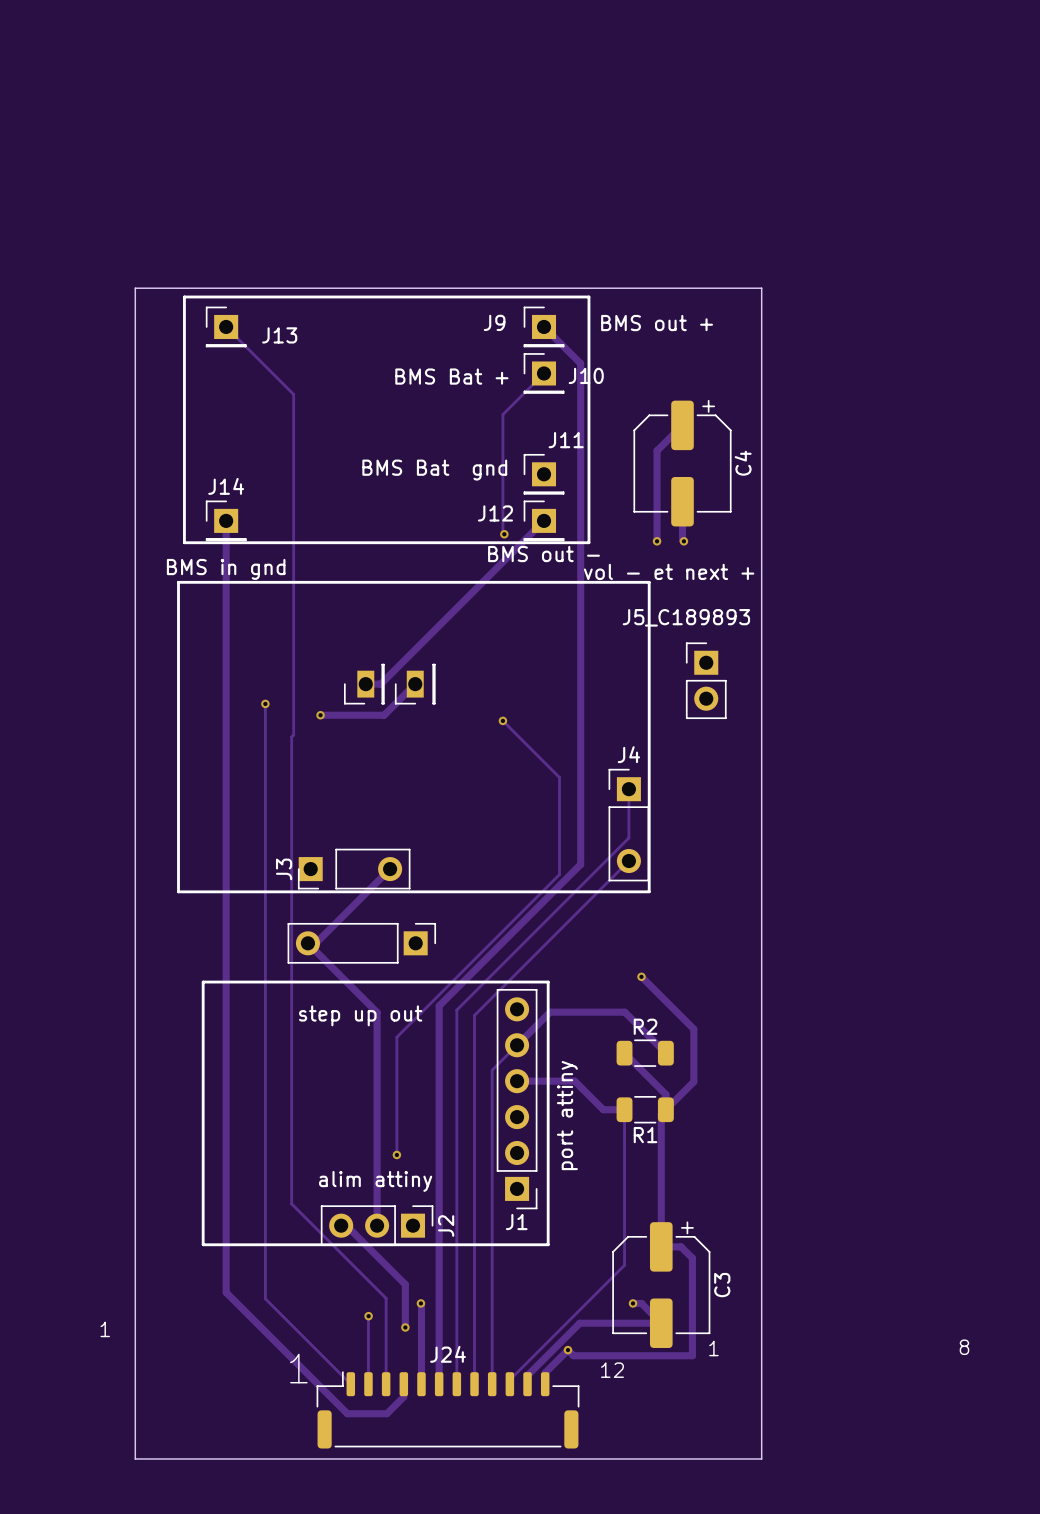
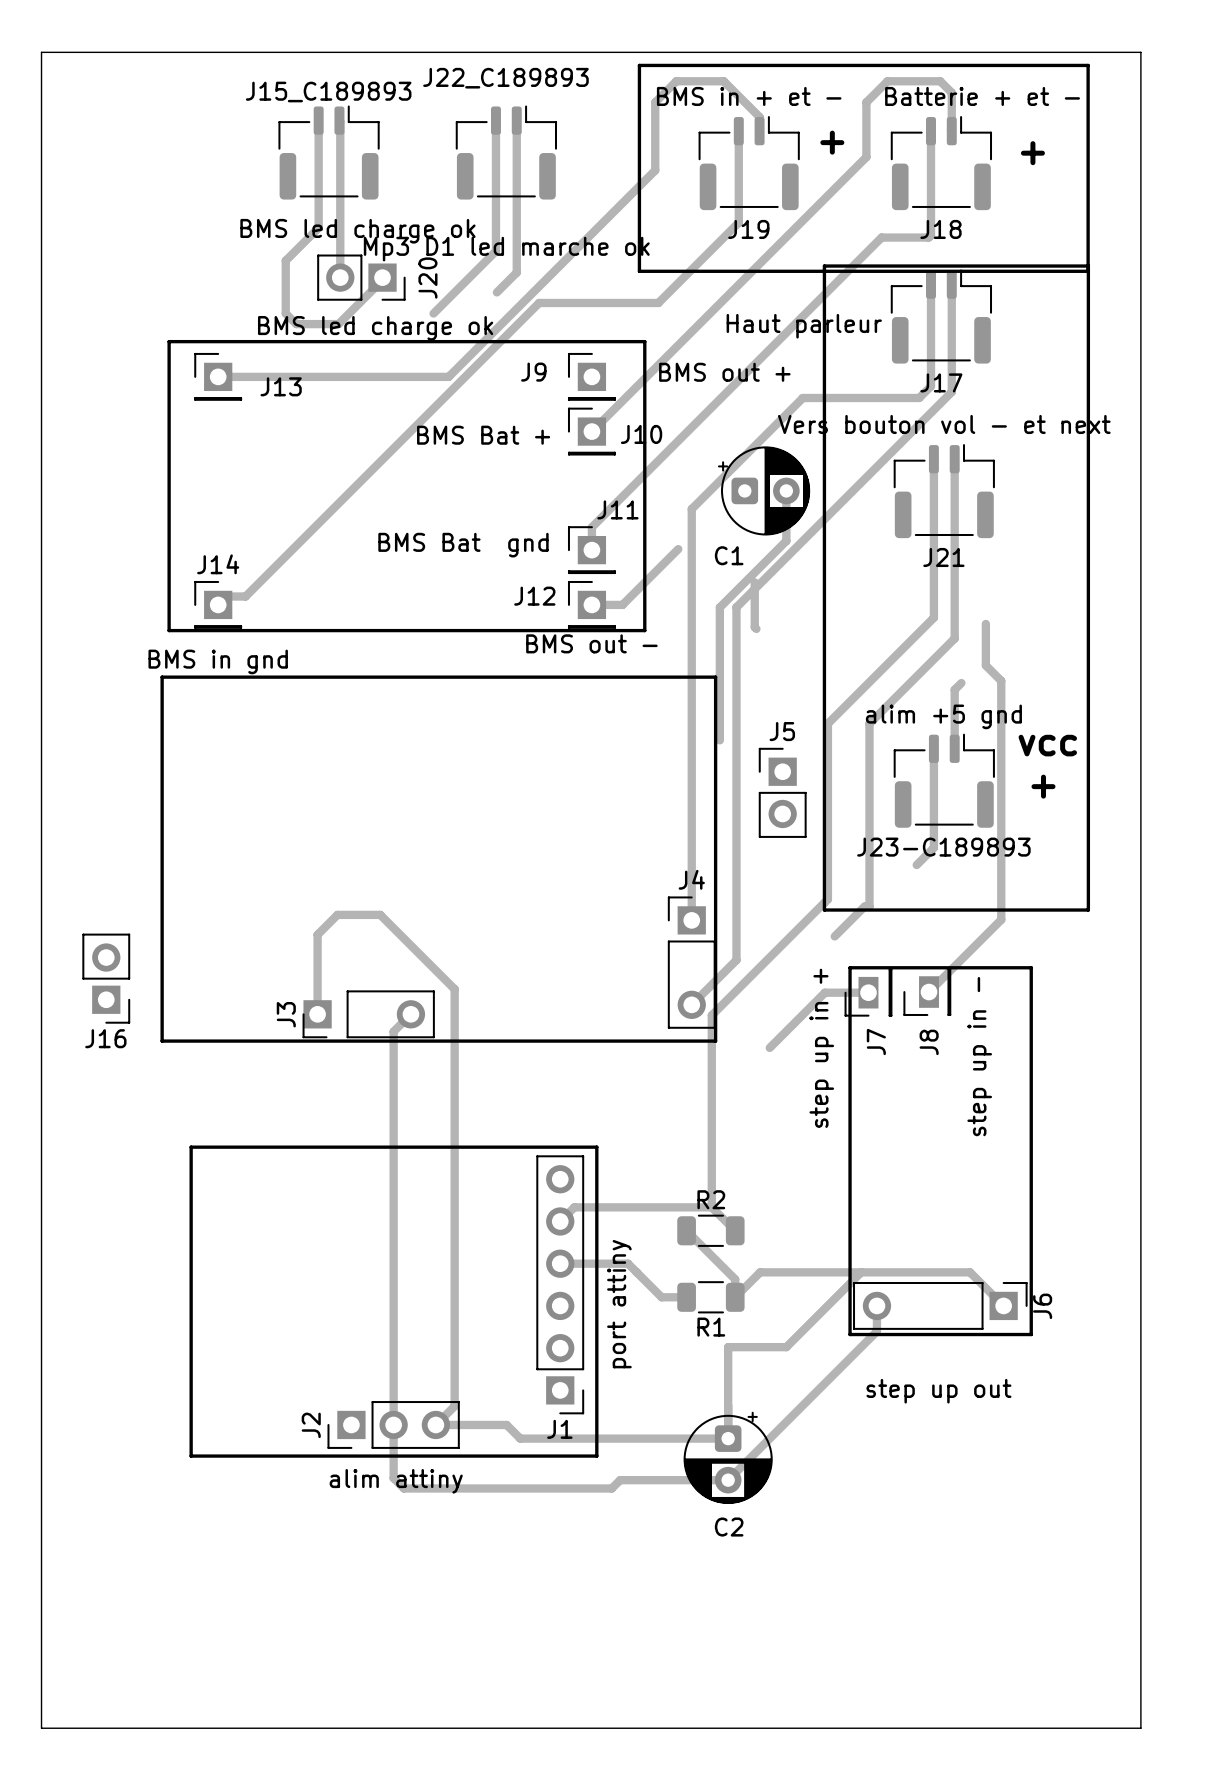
line: none -> (639, 65) (1088, 65) (1088, 271) (639, 271) (639, 65)
track: none -> (318, 120) (318, 227) (285, 260) (285, 313) (296, 324) (338, 324) (382, 280) (382, 277)
track: none -> (339, 120) (340, 277)
track: none -> (495, 120) (495, 251) (433, 313)
track: none -> (516, 120) (516, 272) (496, 292)
track: none -> (738, 131) (738, 222) (658, 302) (539, 302) (245, 596) (226, 596)
track: none -> (931, 131) (931, 235) (928, 237) (881, 237) (591, 527) (591, 550)
text: none -> + (832, 142)
J15_C189893: none -> BMS led charge ok (329, 152)
J22_C189893: none -> Mp3 D1 led marche ok (506, 152)
text: none -> + (1032, 153)
J19: none -> BMS in + et - (749, 163)
J18: none -> Batterie + et - (941, 163)
line: none -> (824, 266) (1088, 266) (1088, 910) (824, 910) (824, 266)
J20: none -> BMS led charge ok (361, 277)
J17: none -> Haut parleur (941, 316)
board edge: (135, 288) (761, 288) (761, 1458) (135, 1458) (135, 288) -> (41, 52) (41, 1728) (1140, 1728) (1140, 52) (41, 52)
track: (226, 326) (293, 394) (291, 1203) (386, 1298) (386, 1384) -> (218, 376) (448, 376) (655, 170) (655, 102) (676, 81) (723, 81) (759, 117) (759, 131)
track: (544, 326) (580, 363) (580, 864) (439, 1005) (439, 1384) -> none
track: (544, 373) (502, 414) (504, 534) -> (591, 431) (866, 157) (866, 102) (887, 81) (940, 81) (951, 92) (950, 130)
track: none -> (954, 459) (954, 638) (869, 723) (869, 906) (864, 906) (834, 936)
C1: none -> (764, 490)
track: none -> (786, 490) (786, 540) (719, 607) (719, 740)
J21: none -> Vers bouton vol - et next (944, 491)
track: (682, 425) (657, 450) (657, 541) -> none
C4: (682, 463) -> none
track: (226, 520) (226, 1292) (347, 1413) (386, 1413) (403, 1396) (403, 1384) -> none
track: (544, 520) (380, 684) (365, 684) -> (591, 604) (622, 604) (678, 549)
via: (504, 534) -> none
track: none -> (985, 623) (985, 665) (1001, 680) (1001, 919) (929, 992)
via: (657, 541) -> none
via: (683, 541) -> none
J5_C189893 value: vol - et next + (669, 571) -> none
track: none -> (961, 683) (954, 689) (954, 748)
J5_C189893 name: J5_C189893 (686, 617) -> J5 (782, 731)
text: none -> vcc (1047, 745)
track: none -> (933, 748) (933, 847) (916, 865)
J23-C189893: none -> alim +5 gnd (944, 780)
text: none -> + (1043, 786)
part: (364, 684) -> none
track: (415, 684) (384, 715) (320, 715) -> none
part: (415, 684) -> none
track: (265, 703) (265, 1298) (350, 1384) -> none
via: (265, 703) -> none
via: (320, 715) -> none
track: (502, 720) (559, 777) (559, 874) (396, 1037) (396, 1154) -> none
via: (502, 720) -> none
track: (628, 789) (628, 838) (456, 1010) (456, 1384) -> (691, 920) (691, 509) (802, 398) (919, 398) (931, 386) (931, 284)
line: none -> (850, 967) (1031, 967) (1031, 1334) (850, 1334) (850, 967)
J16: none -> (106, 978)
track: none -> (868, 992) (824, 992) (769, 1047)
J7: none -> step up in + (868, 992)
J8: none -> step up in - (927, 992)
track: (628, 861) (474, 1015) (474, 1384) -> (691, 1004) (736, 960) (736, 607) (951, 392) (951, 284)
track: none -> (317, 1014) (317, 934) (337, 914) (380, 914) (454, 989) (454, 1406) (435, 1424) (506, 1424) (520, 1438) (728, 1438) (728, 1347) (786, 1347) (861, 1272)
track: (375, 883) (315, 943) (307, 943) (377, 1012) (377, 1225) -> (393, 1031) (393, 1478) (403, 1488) (611, 1488) (620, 1480) (728, 1480) (876, 1331) (876, 1305)
part: step up out (361, 943) -> none
track: (641, 976) (693, 1029) (693, 1081) (687, 1088) -> (1003, 1305) (970, 1272) (760, 1272)
via: (641, 976) -> none
track: (529, 1033) (550, 1012) (624, 1012) (645, 1033) -> (574, 1207) (711, 1207) (711, 1015) (827, 899) (827, 723) (933, 617) (933, 459)
track: (517, 1045) (492, 1070) (492, 1384) -> none
track: (624, 1109) (624, 1265) (509, 1379) (509, 1384) -> none
track: (665, 1109) (661, 1114) (661, 1246) (681, 1246) (692, 1258) (692, 1355) (573, 1355) (567, 1350) (545, 1372) (545, 1384) -> none
J6: none -> step up out (940, 1305)
via: (396, 1154) -> none
track: (341, 1225) (346, 1225) (405, 1284) (405, 1327) -> none
J2 rotation: 0° (377, 1225) -> 180° (393, 1424)
C2: none -> (728, 1457)
C3: (661, 1284) -> none
track: (420, 1303) (421, 1391) -> none
via: (420, 1303) -> none
track: (633, 1303) (641, 1303) (661, 1323) (579, 1323) (527, 1375) (527, 1384) -> none
via: (633, 1303) -> none
track: (368, 1316) (368, 1384) -> none
via: (368, 1316) -> none
via: (405, 1327) -> none
text: 1 (105, 1329) -> none
text: 8 (964, 1347) -> none
text: 1 (713, 1348) -> none
via: (567, 1350) -> none
text: 1 (298, 1368) -> none
text: 12 (612, 1370) -> none
J24: (448, 1409) -> none

